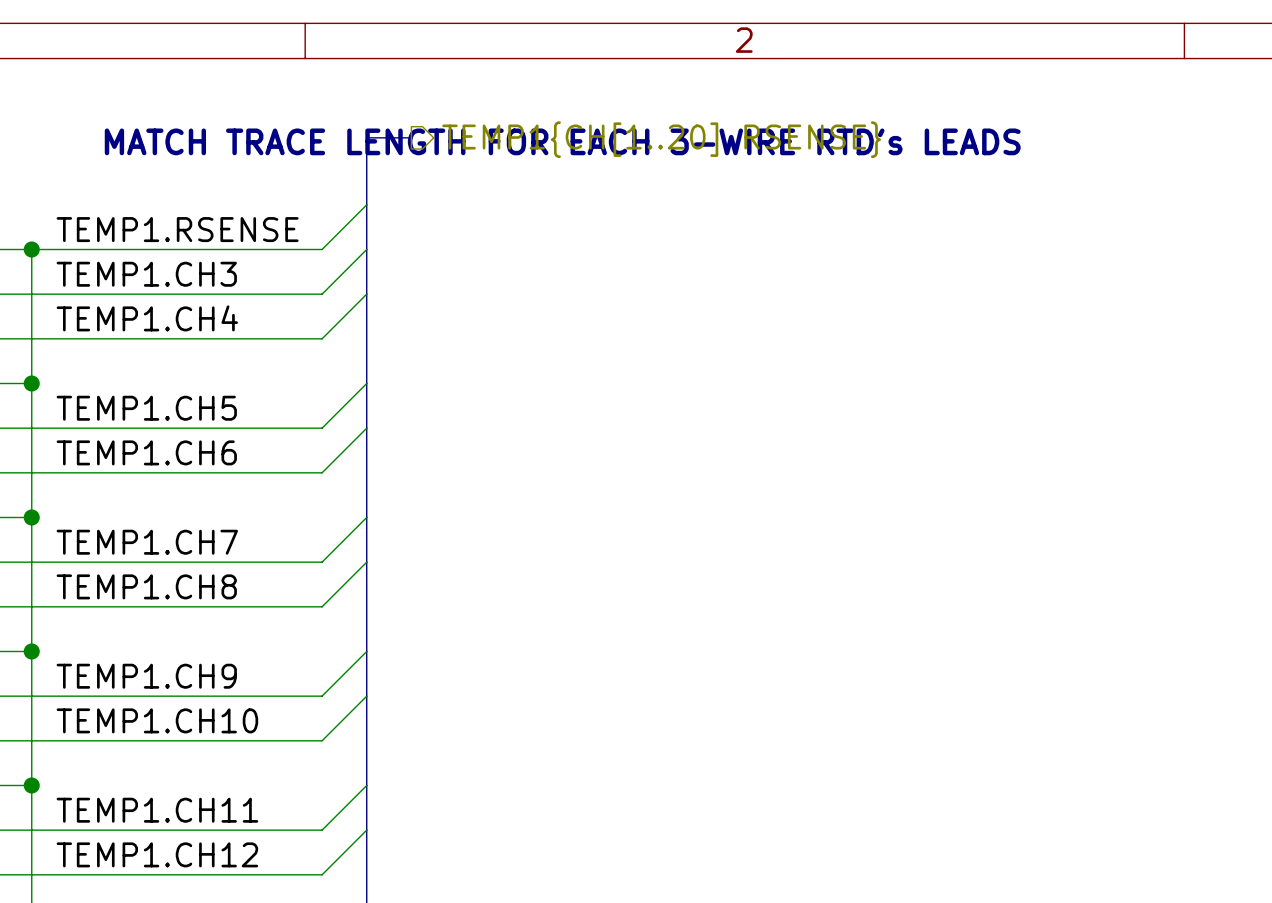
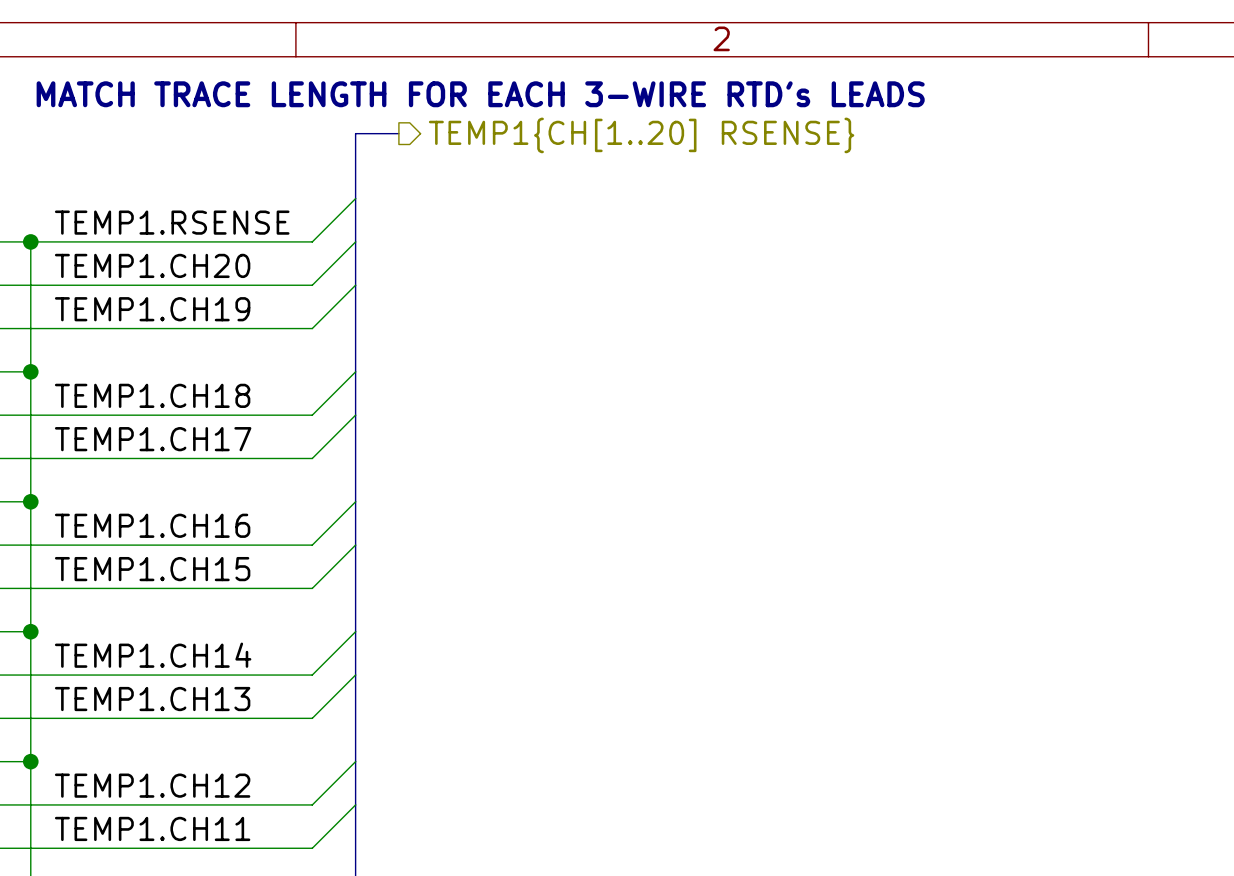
text position: MATCH TRACE LENGTH FOR EACH 3-WIRE RTD's LEADS (562, 141) -> MATCH TRACE LENGTH FOR EACH 3-WIRE RTD's LEADS (480, 94)
label: TEMP1.CH3 (146, 274) -> TEMP1.CH20 (152, 265)
label: TEMP1.CH4 (147, 318) -> TEMP1.CH19 (152, 309)
label: TEMP1.CH5 (146, 408) -> TEMP1.CH18 (152, 395)
label: TEMP1.CH6 (146, 452) -> TEMP1.CH17 (153, 439)
label: TEMP1.CH7 (147, 542) -> TEMP1.CH16 (152, 525)
label: TEMP1.CH8 (146, 586) -> TEMP1.CH15 (152, 569)
label: TEMP1.CH9 (146, 676) -> TEMP1.CH14 (153, 655)
label: TEMP1.CH10 (157, 720) -> TEMP1.CH13 (152, 699)
label: TEMP1.CH11 (157, 810) -> TEMP1.CH12 (152, 785)
label: TEMP1.CH12 (157, 854) -> TEMP1.CH11 (152, 828)

